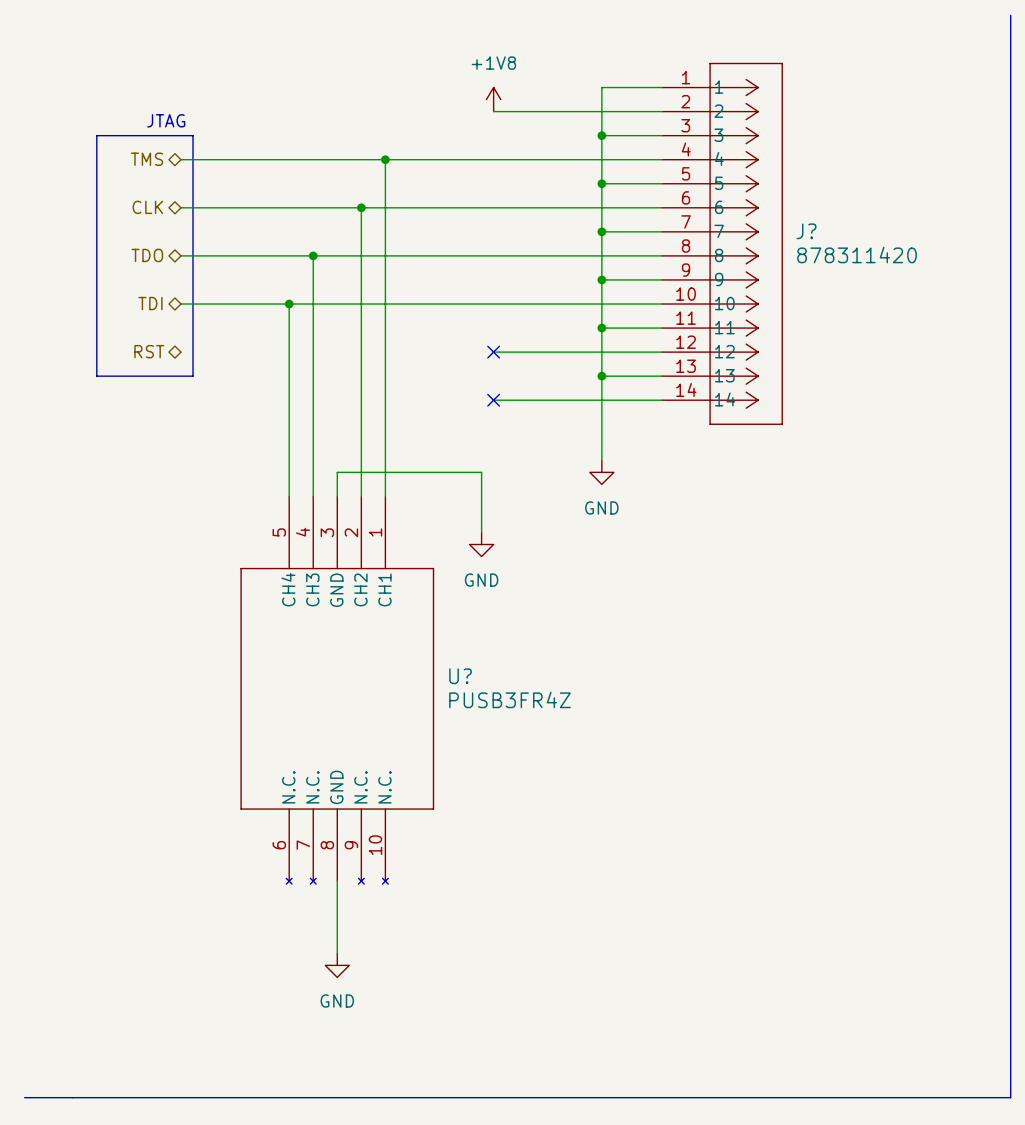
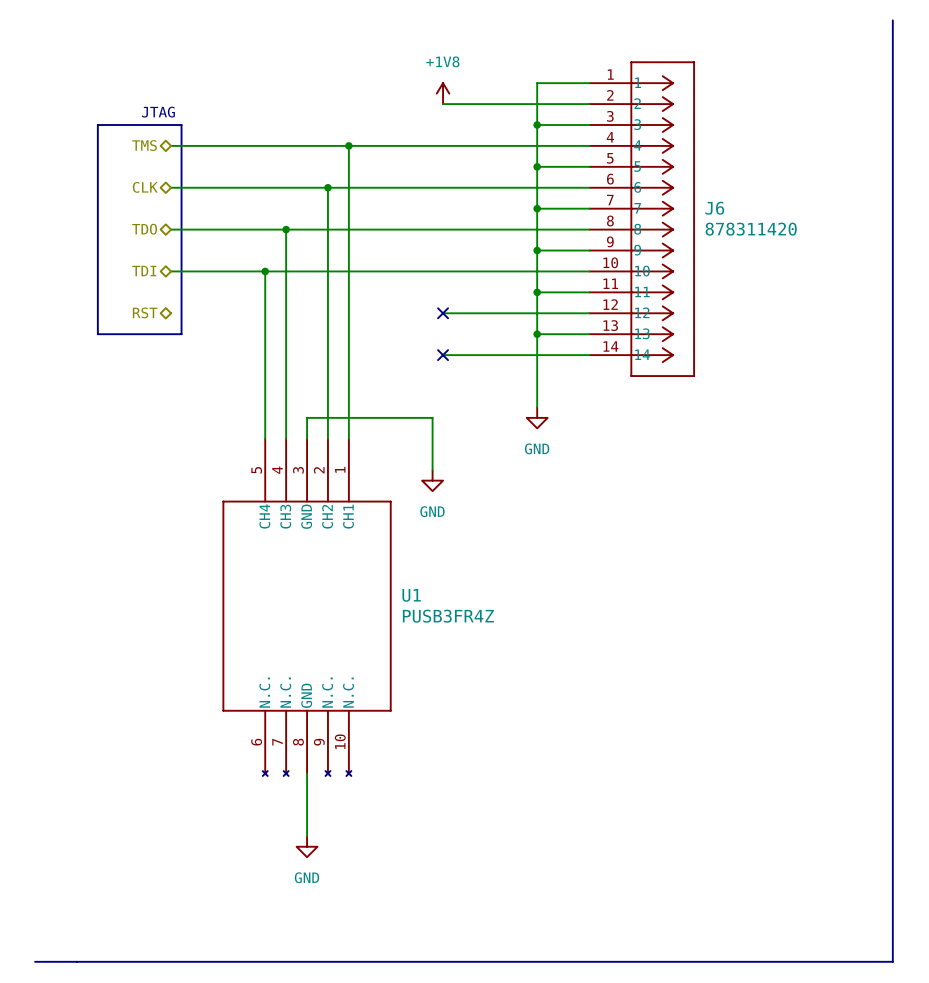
J? name: J? (806, 231) -> J6 (714, 208)
U? name: U? (460, 676) -> U1 (411, 595)

